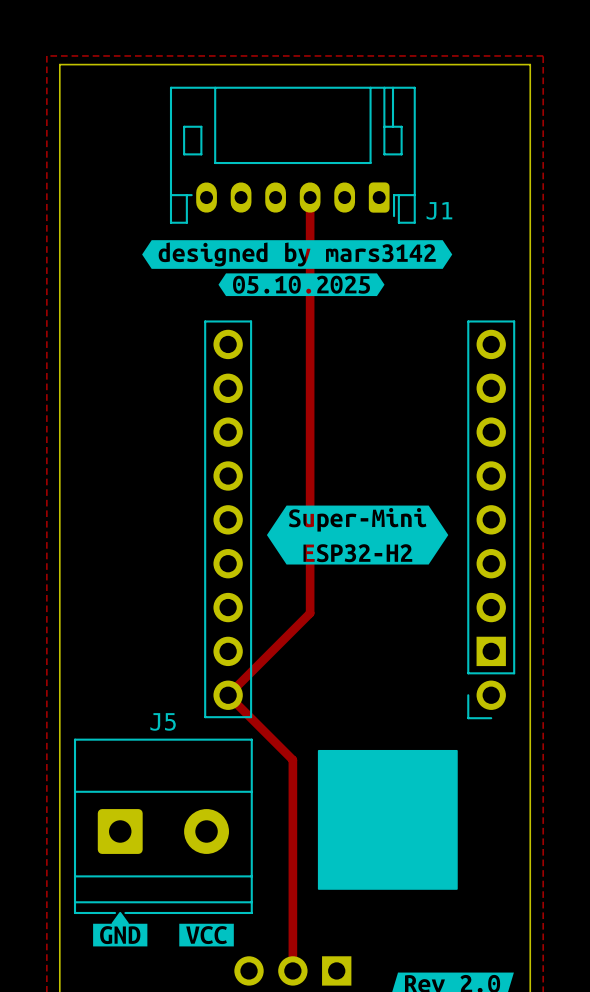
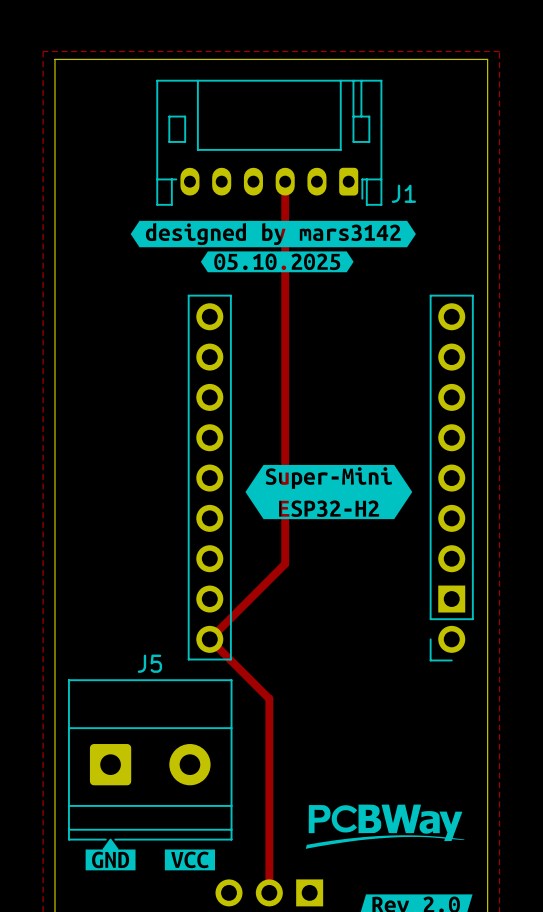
drawing: [317, 749, 458, 890] -> none
drawing: none -> [305, 804, 465, 849]

